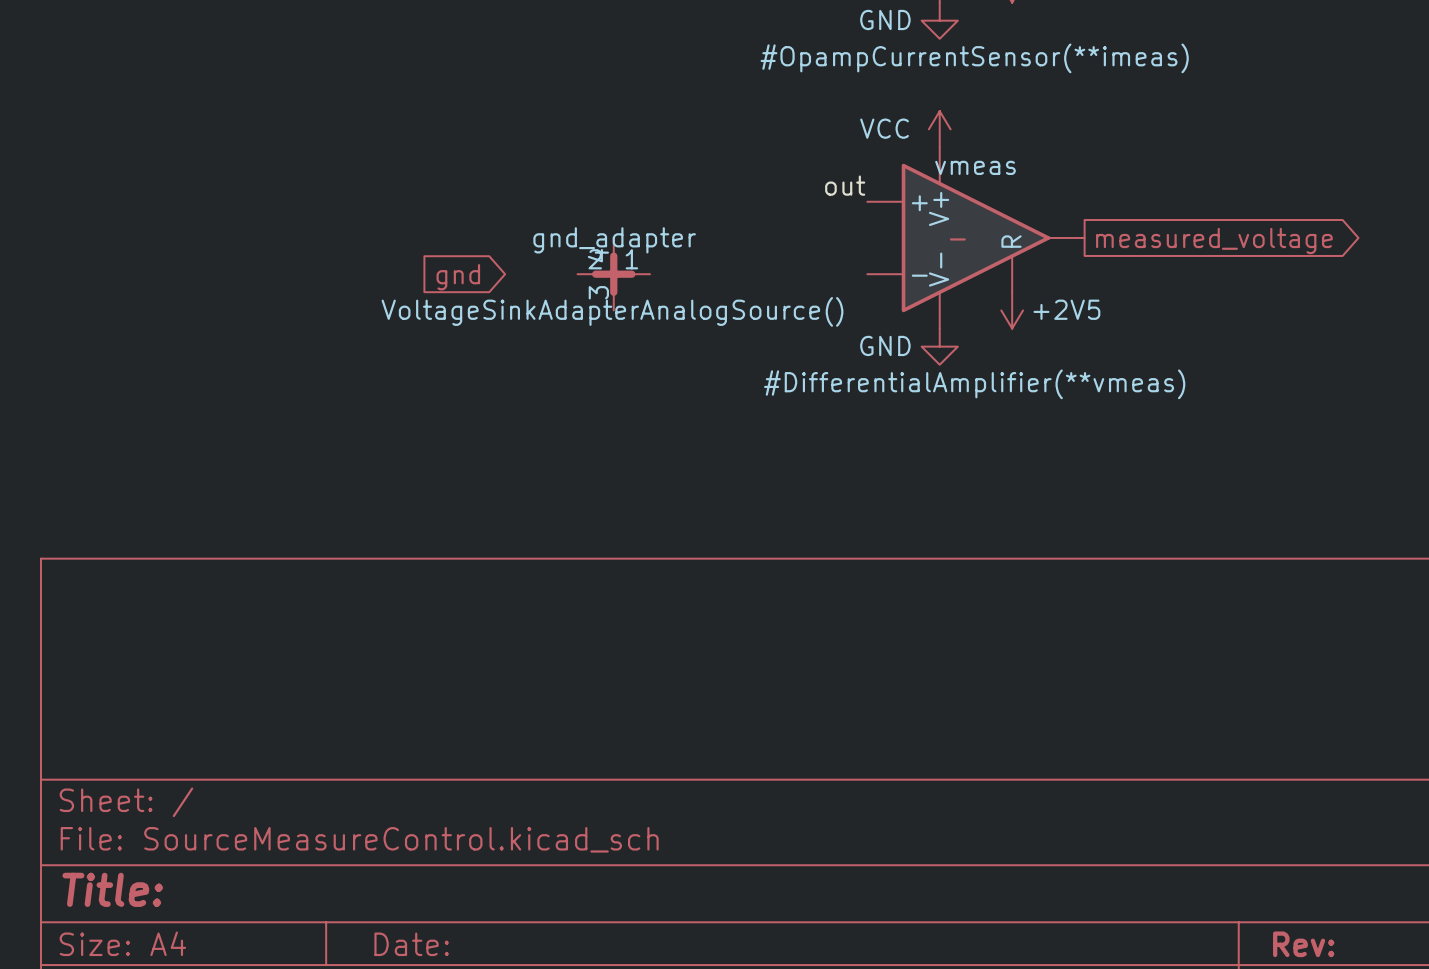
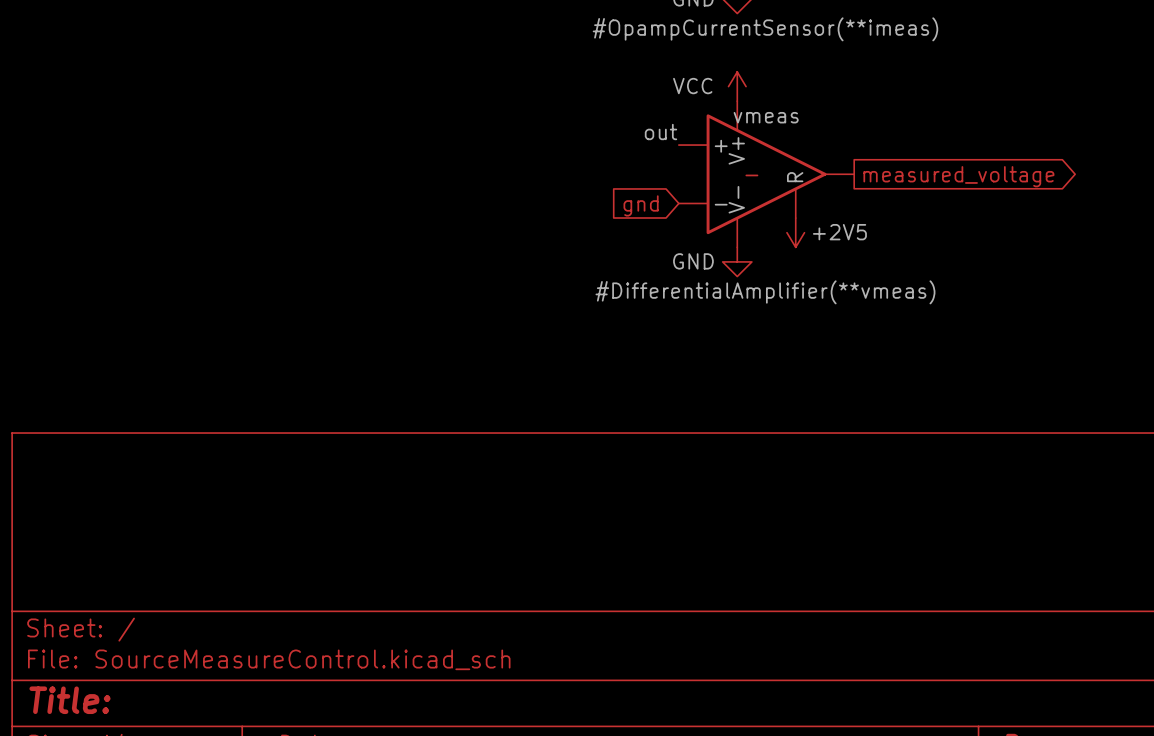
gnd_adapter: VoltageSinkAdapterAnalogSource() (613, 274) -> none
global label: gnd (458, 277) -> none
global label: none -> gnd (641, 205)

